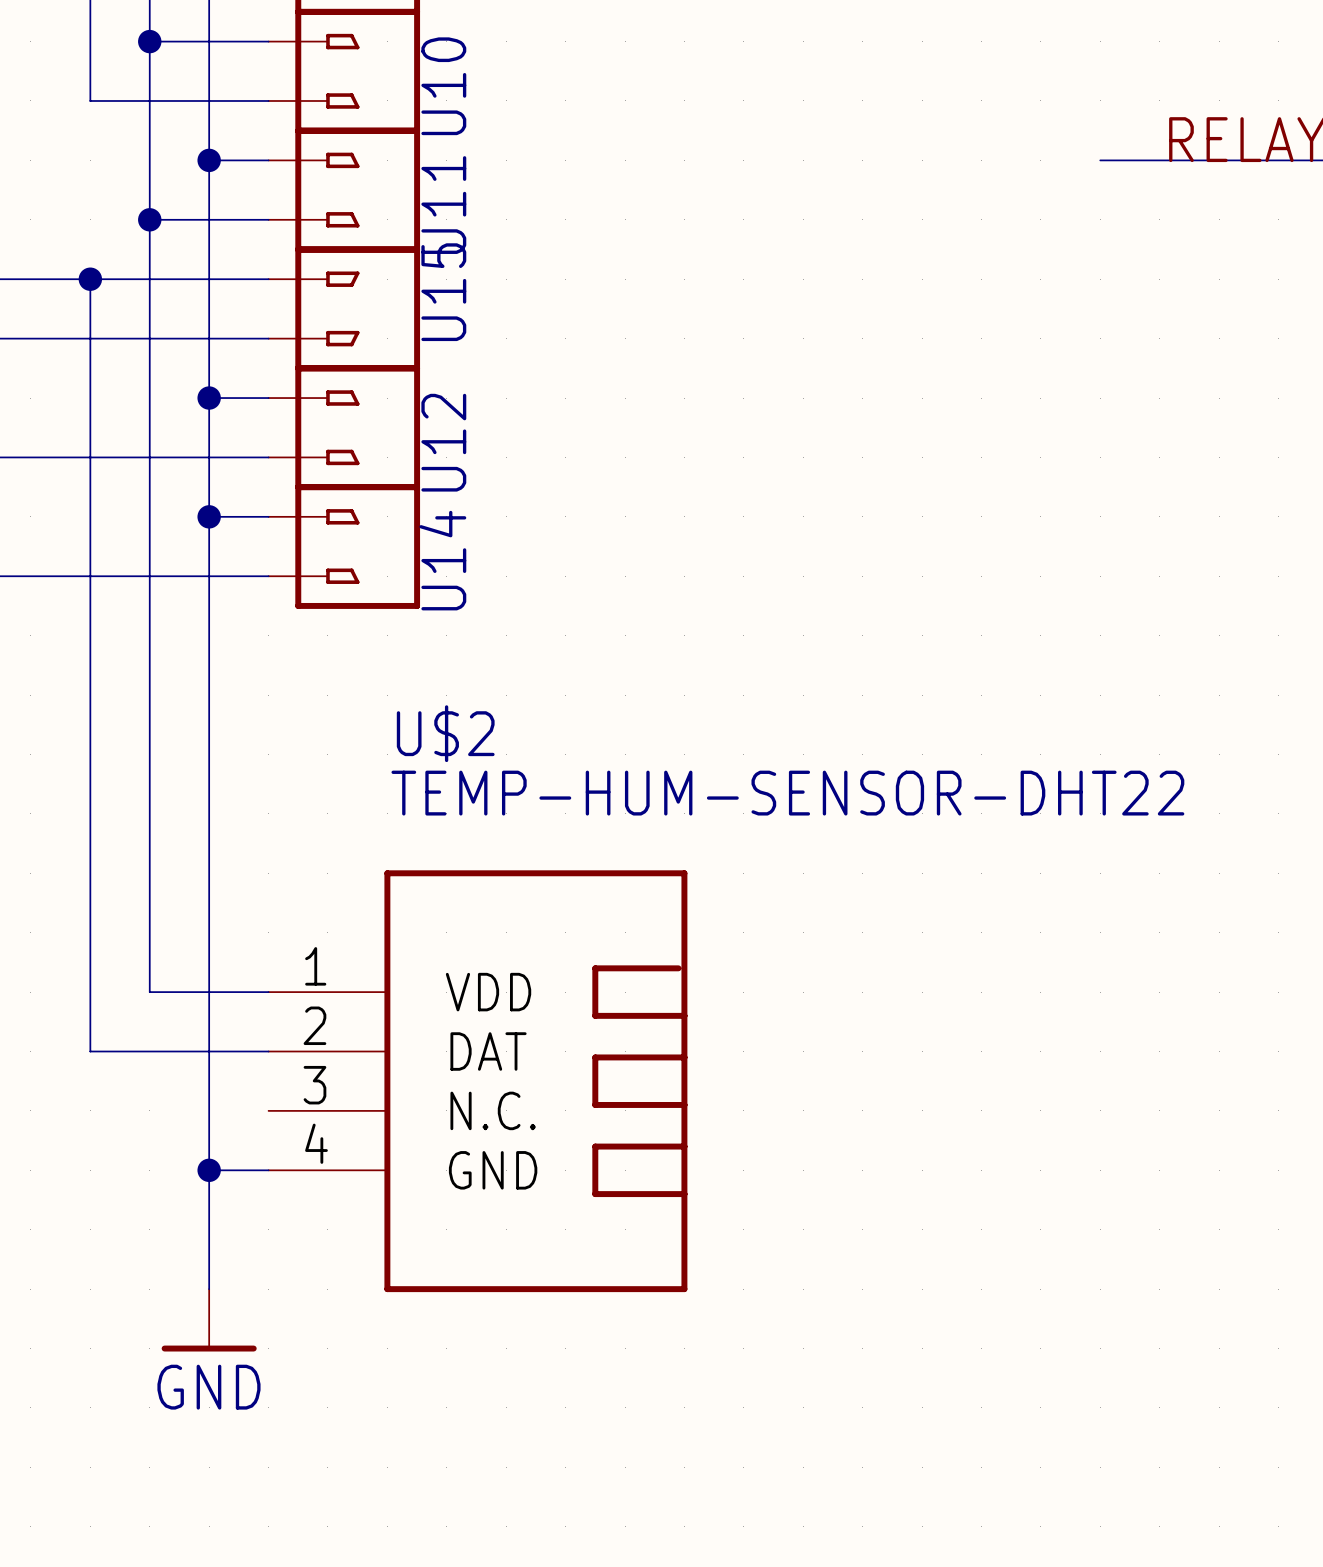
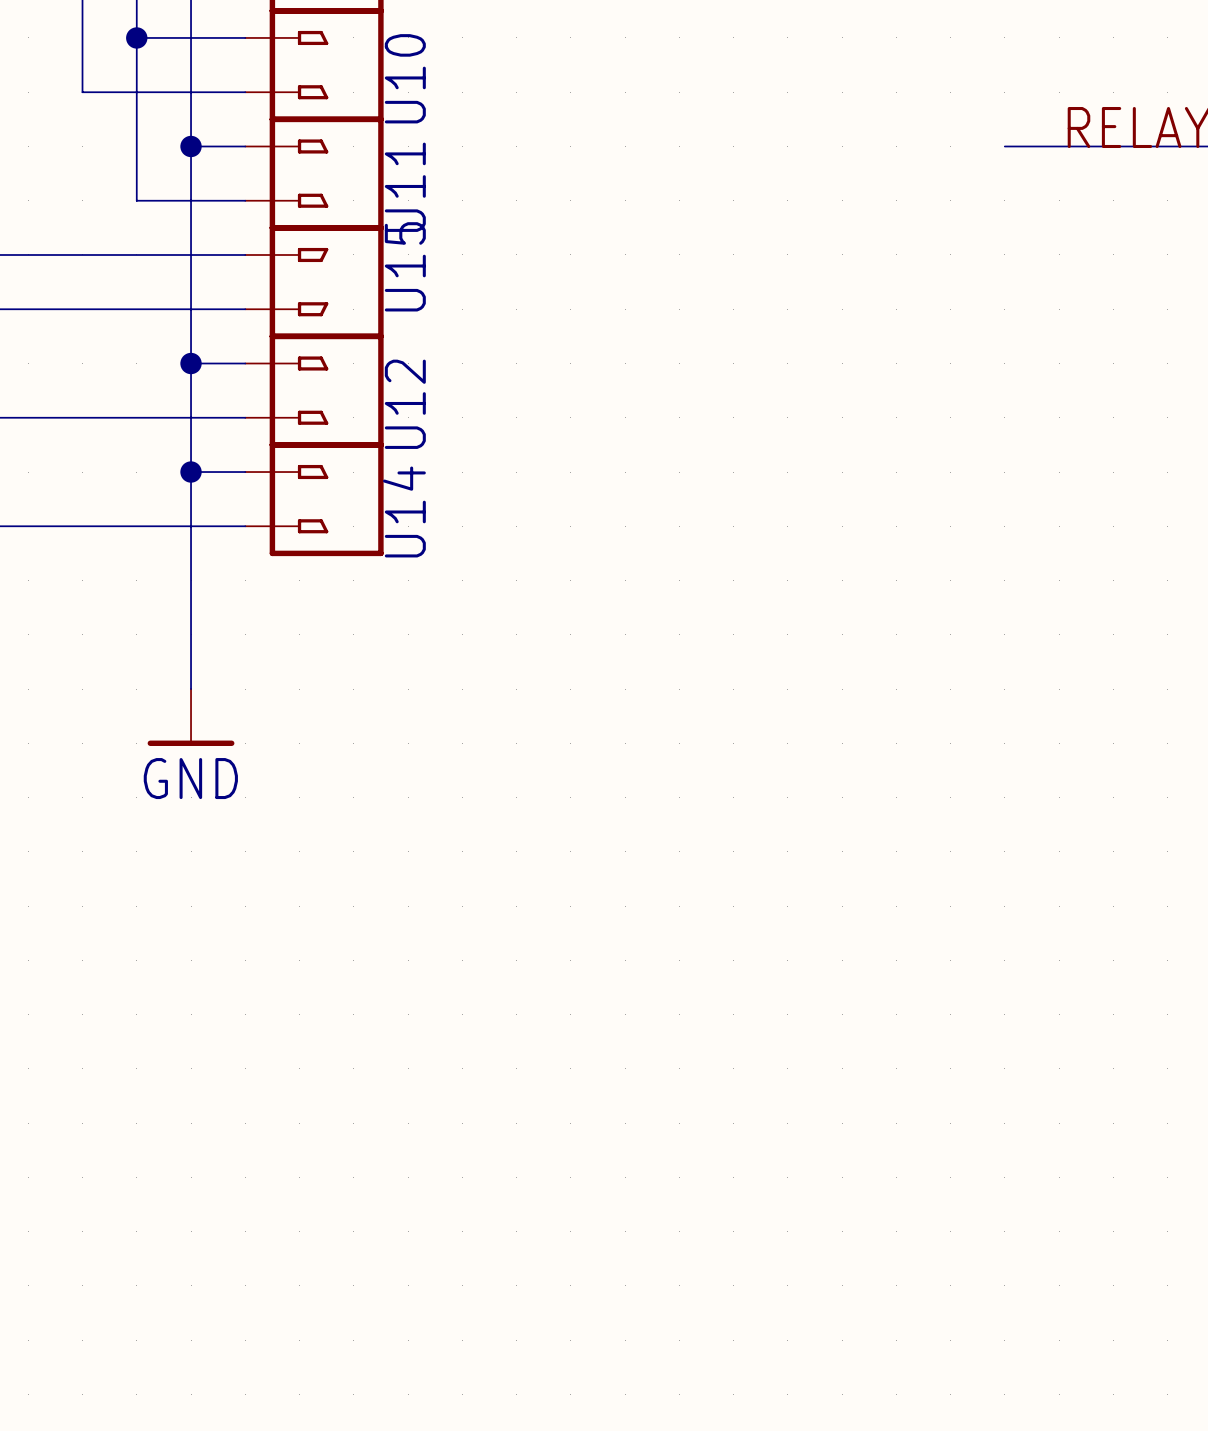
wire: (149, 219) (149, 992) (268, 992) -> none
junction: (149, 219) -> none
wire: (90, 279) (90, 1051) (268, 1051) -> none
junction: (90, 279) -> none
wire: (209, 754) (209, 1289) -> none
U$2: TEMP-HUM-SENSOR-DHT22 (477, 1081) -> none
wire: (209, 1170) (268, 1170) -> none
junction: (209, 1170) -> none
power symbol position: GND (209, 1320) -> GND (191, 717)

